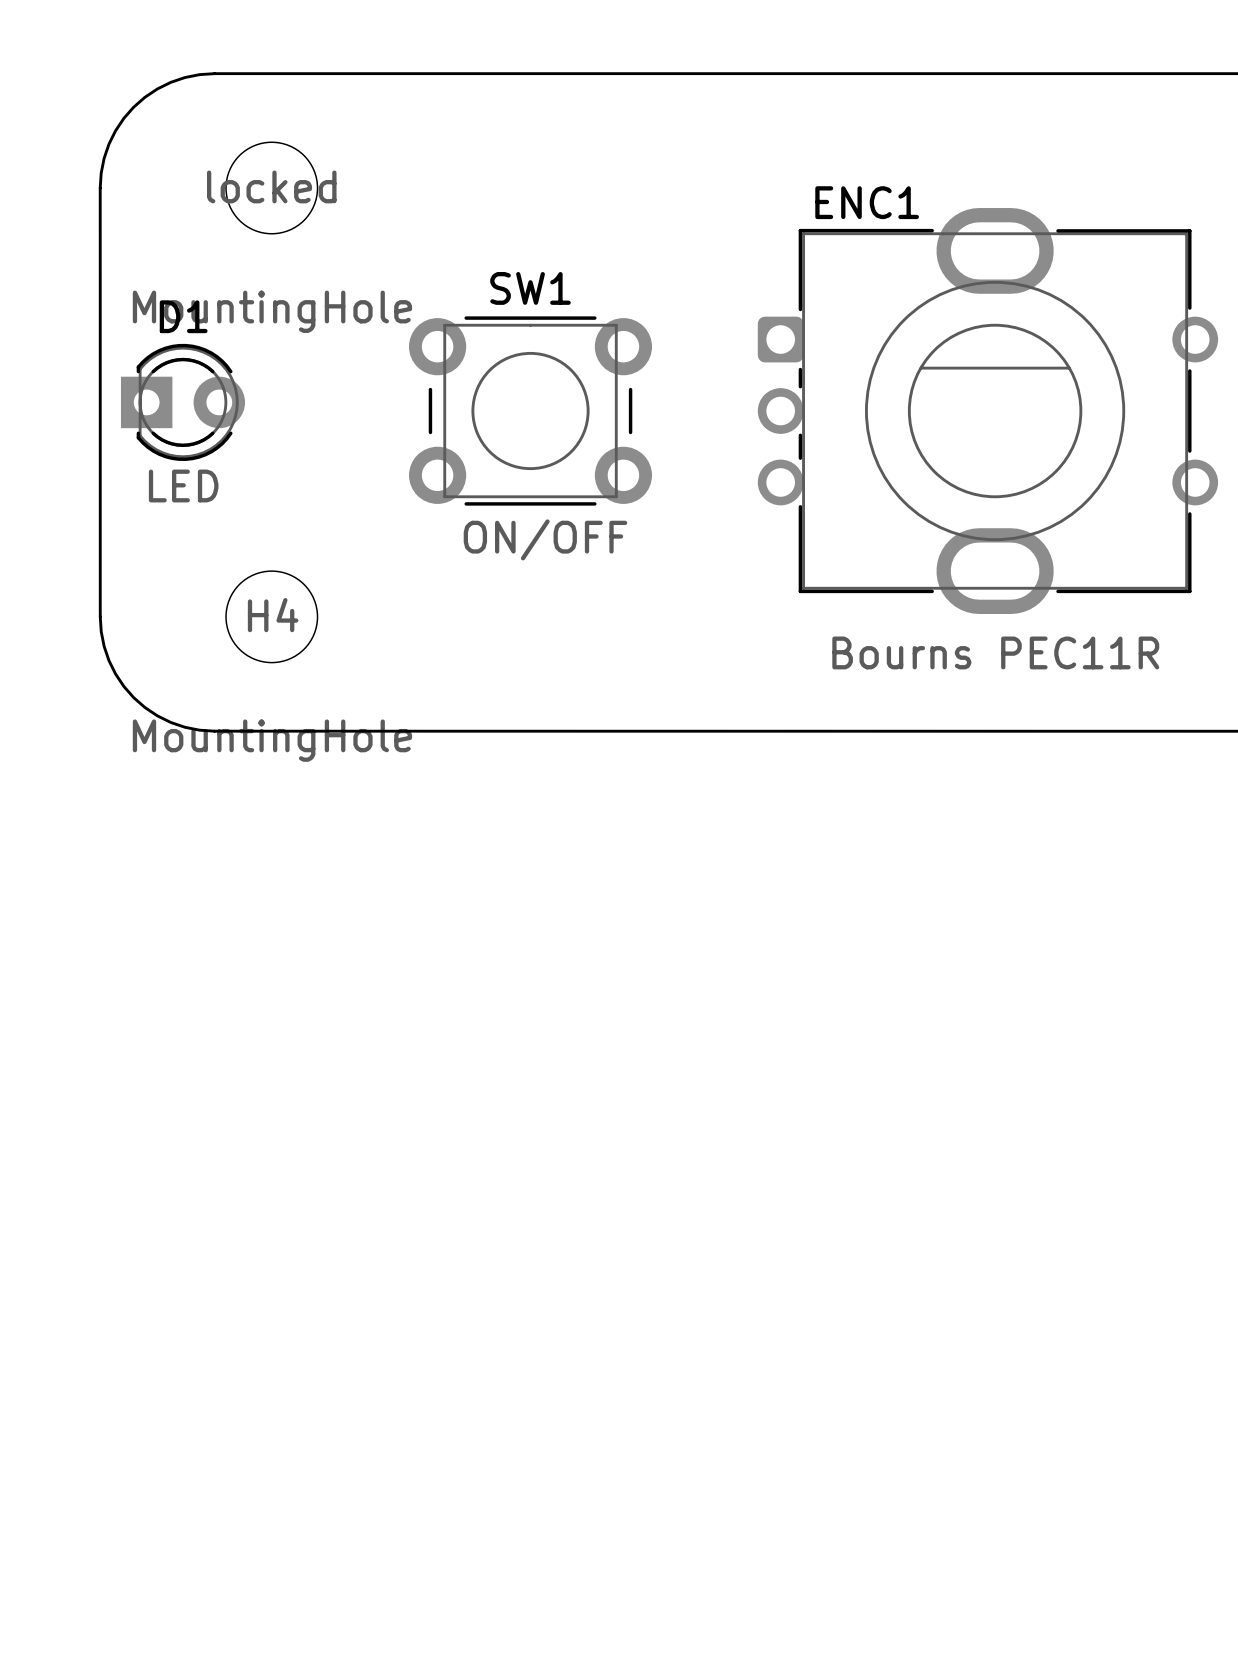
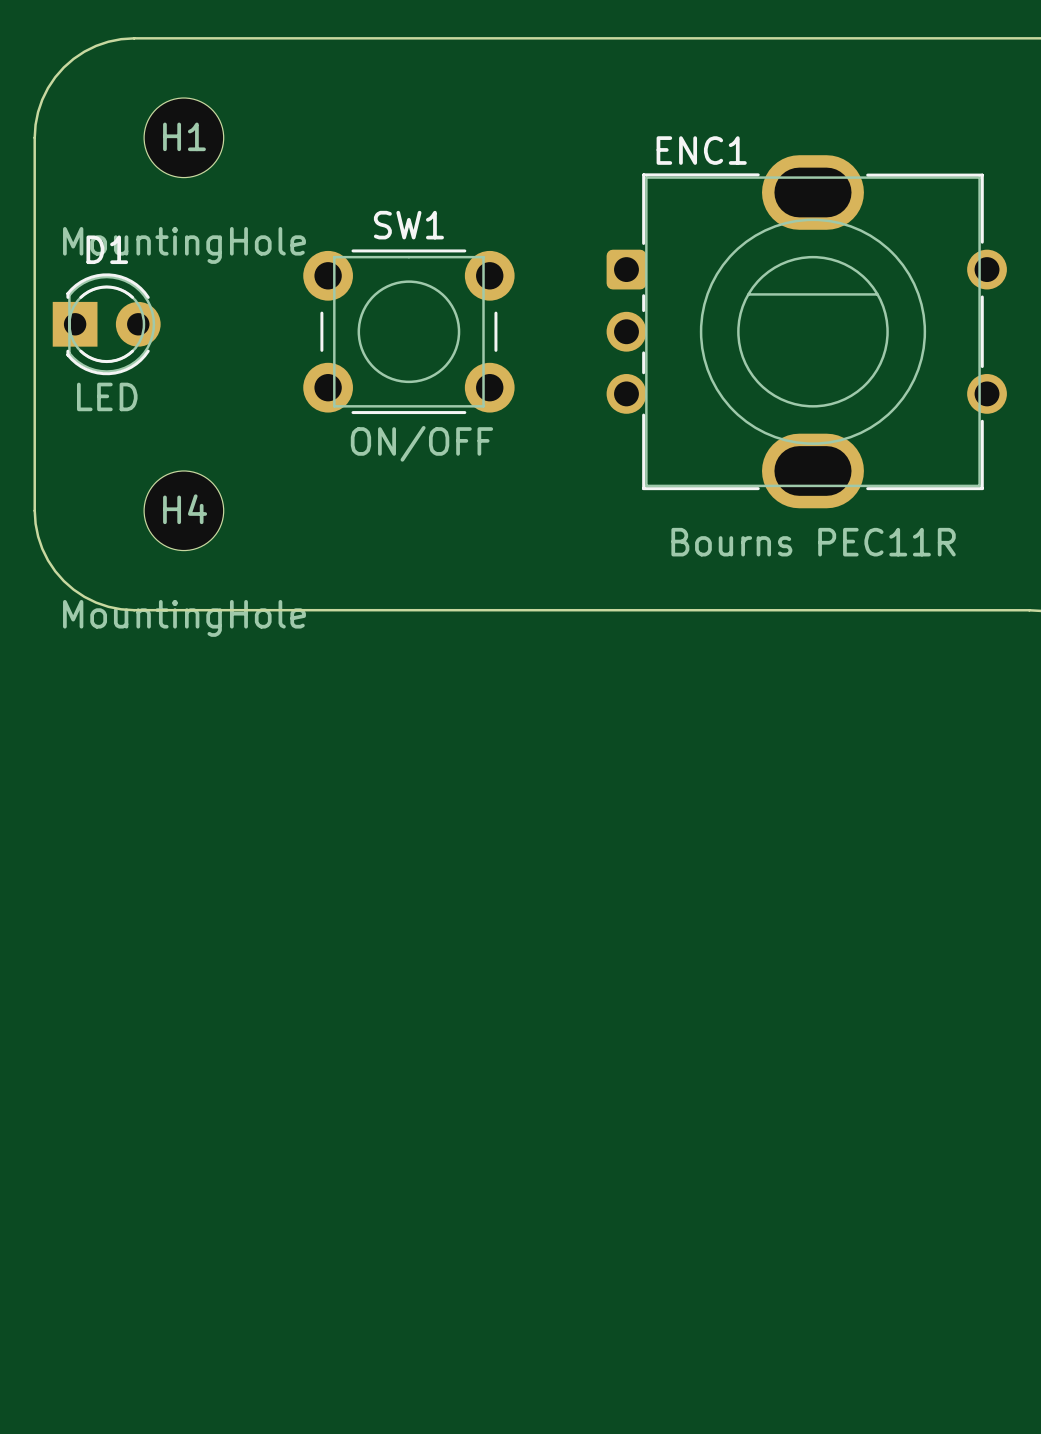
locked name: locked (271, 186) -> H1 (184, 136)

